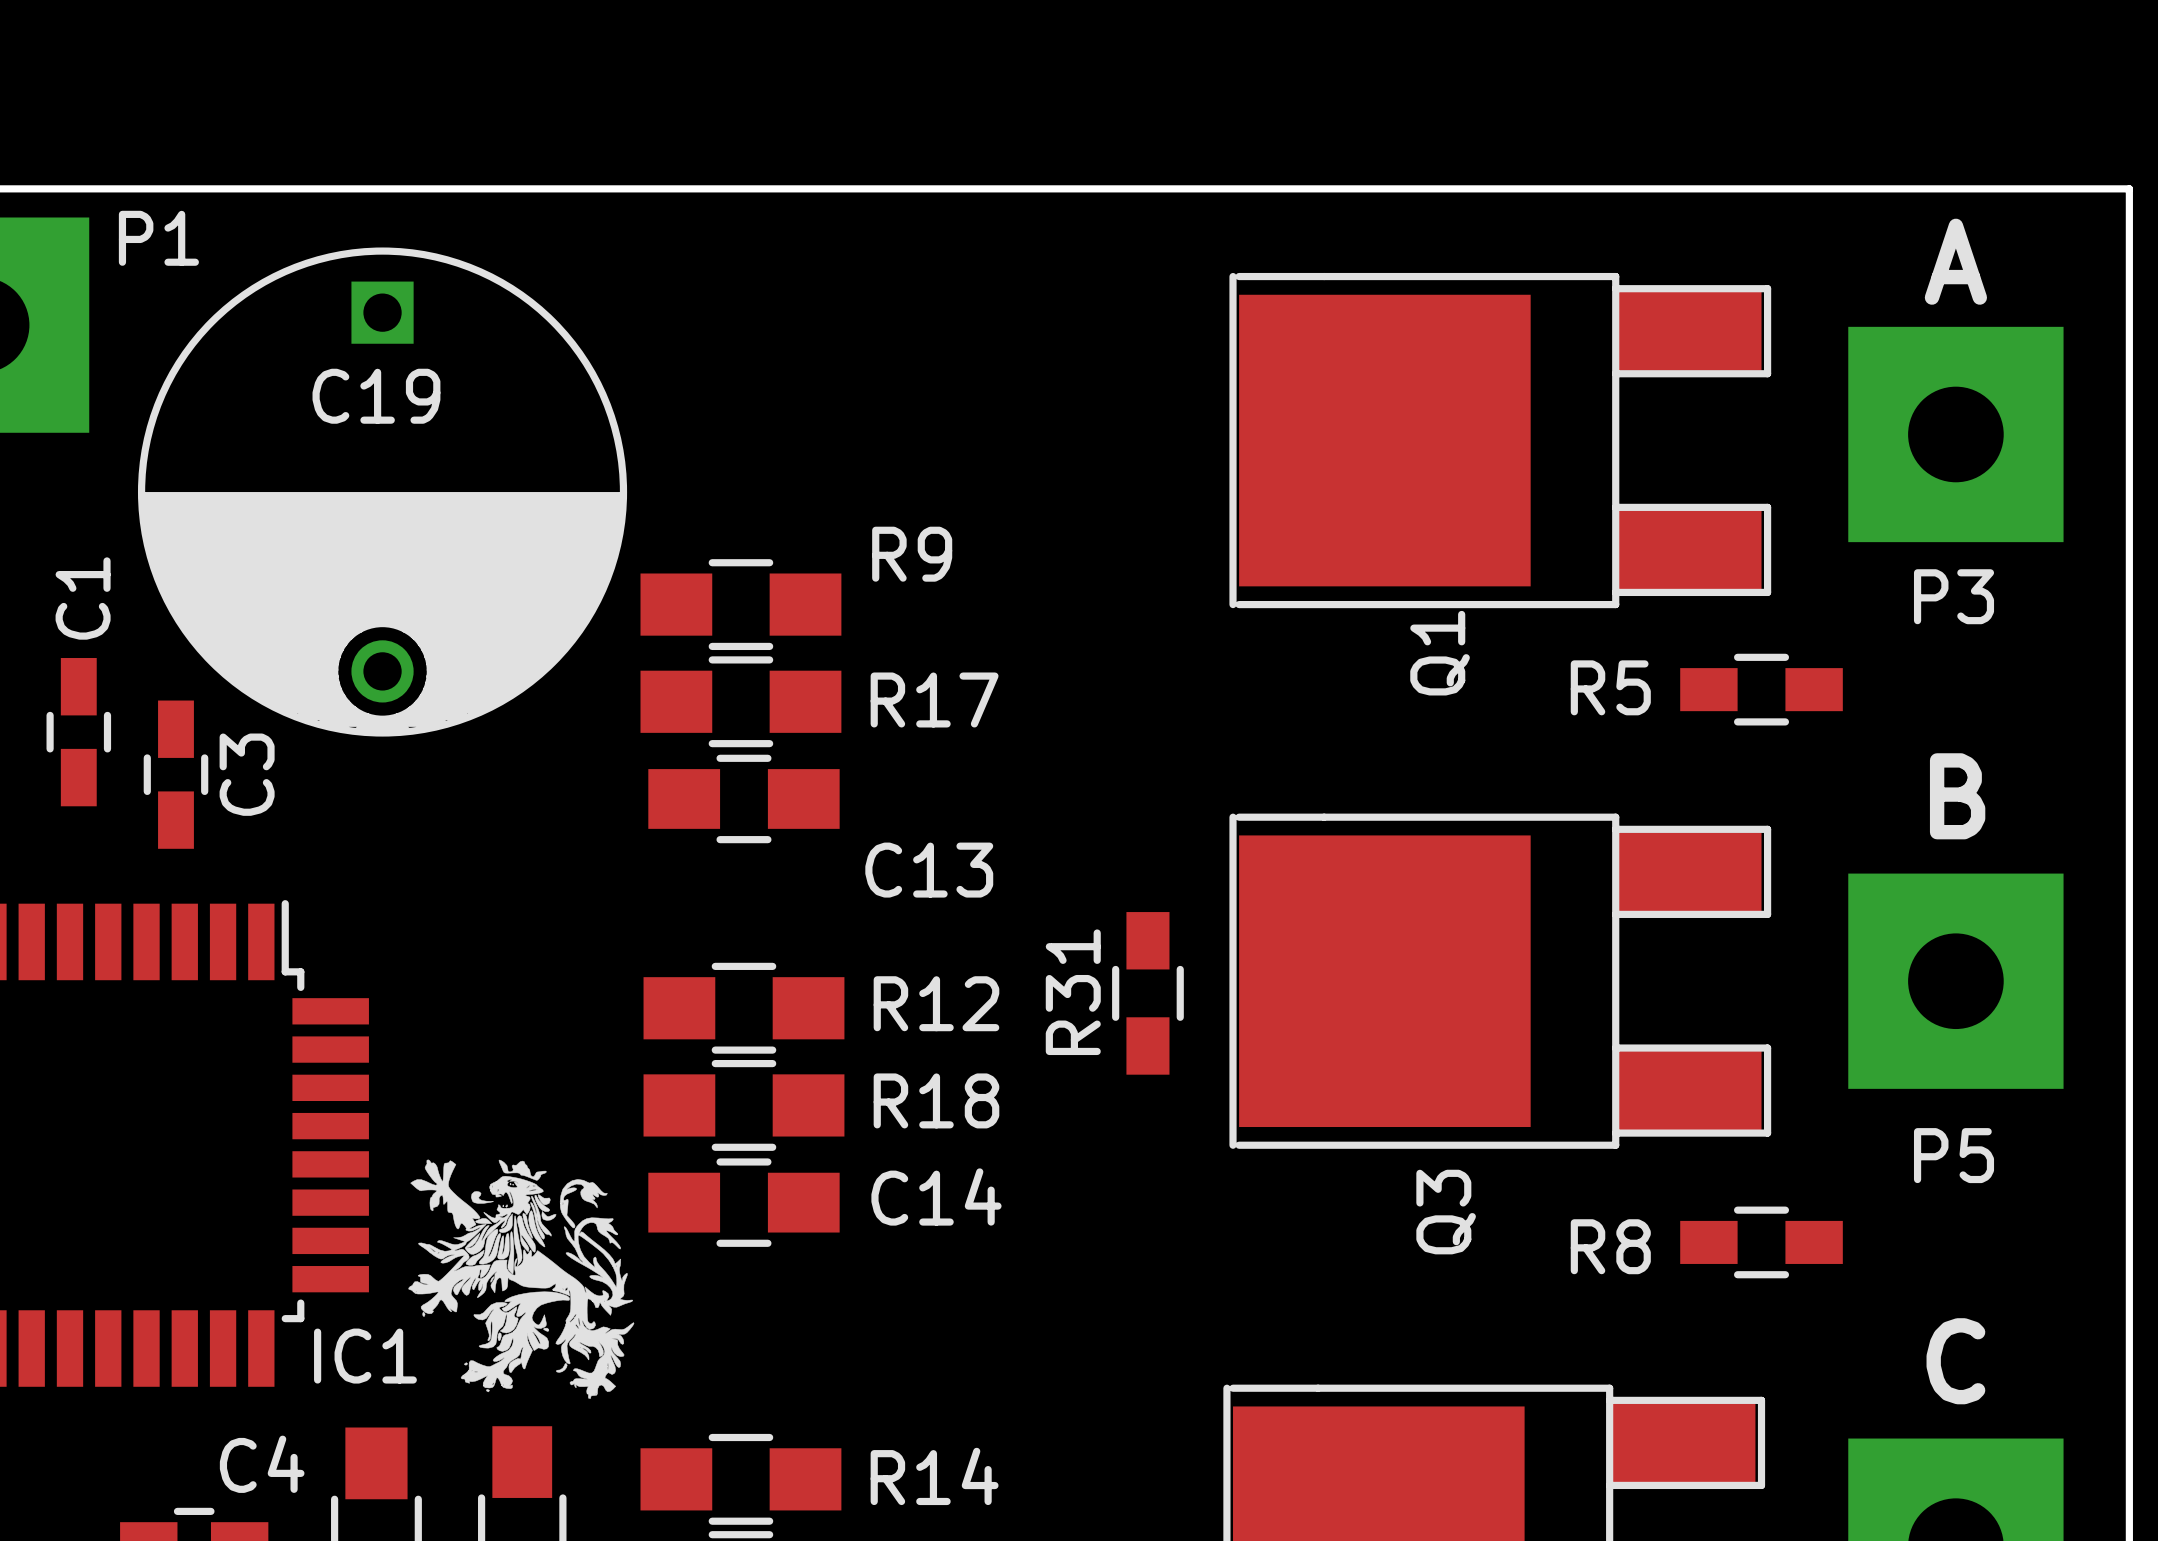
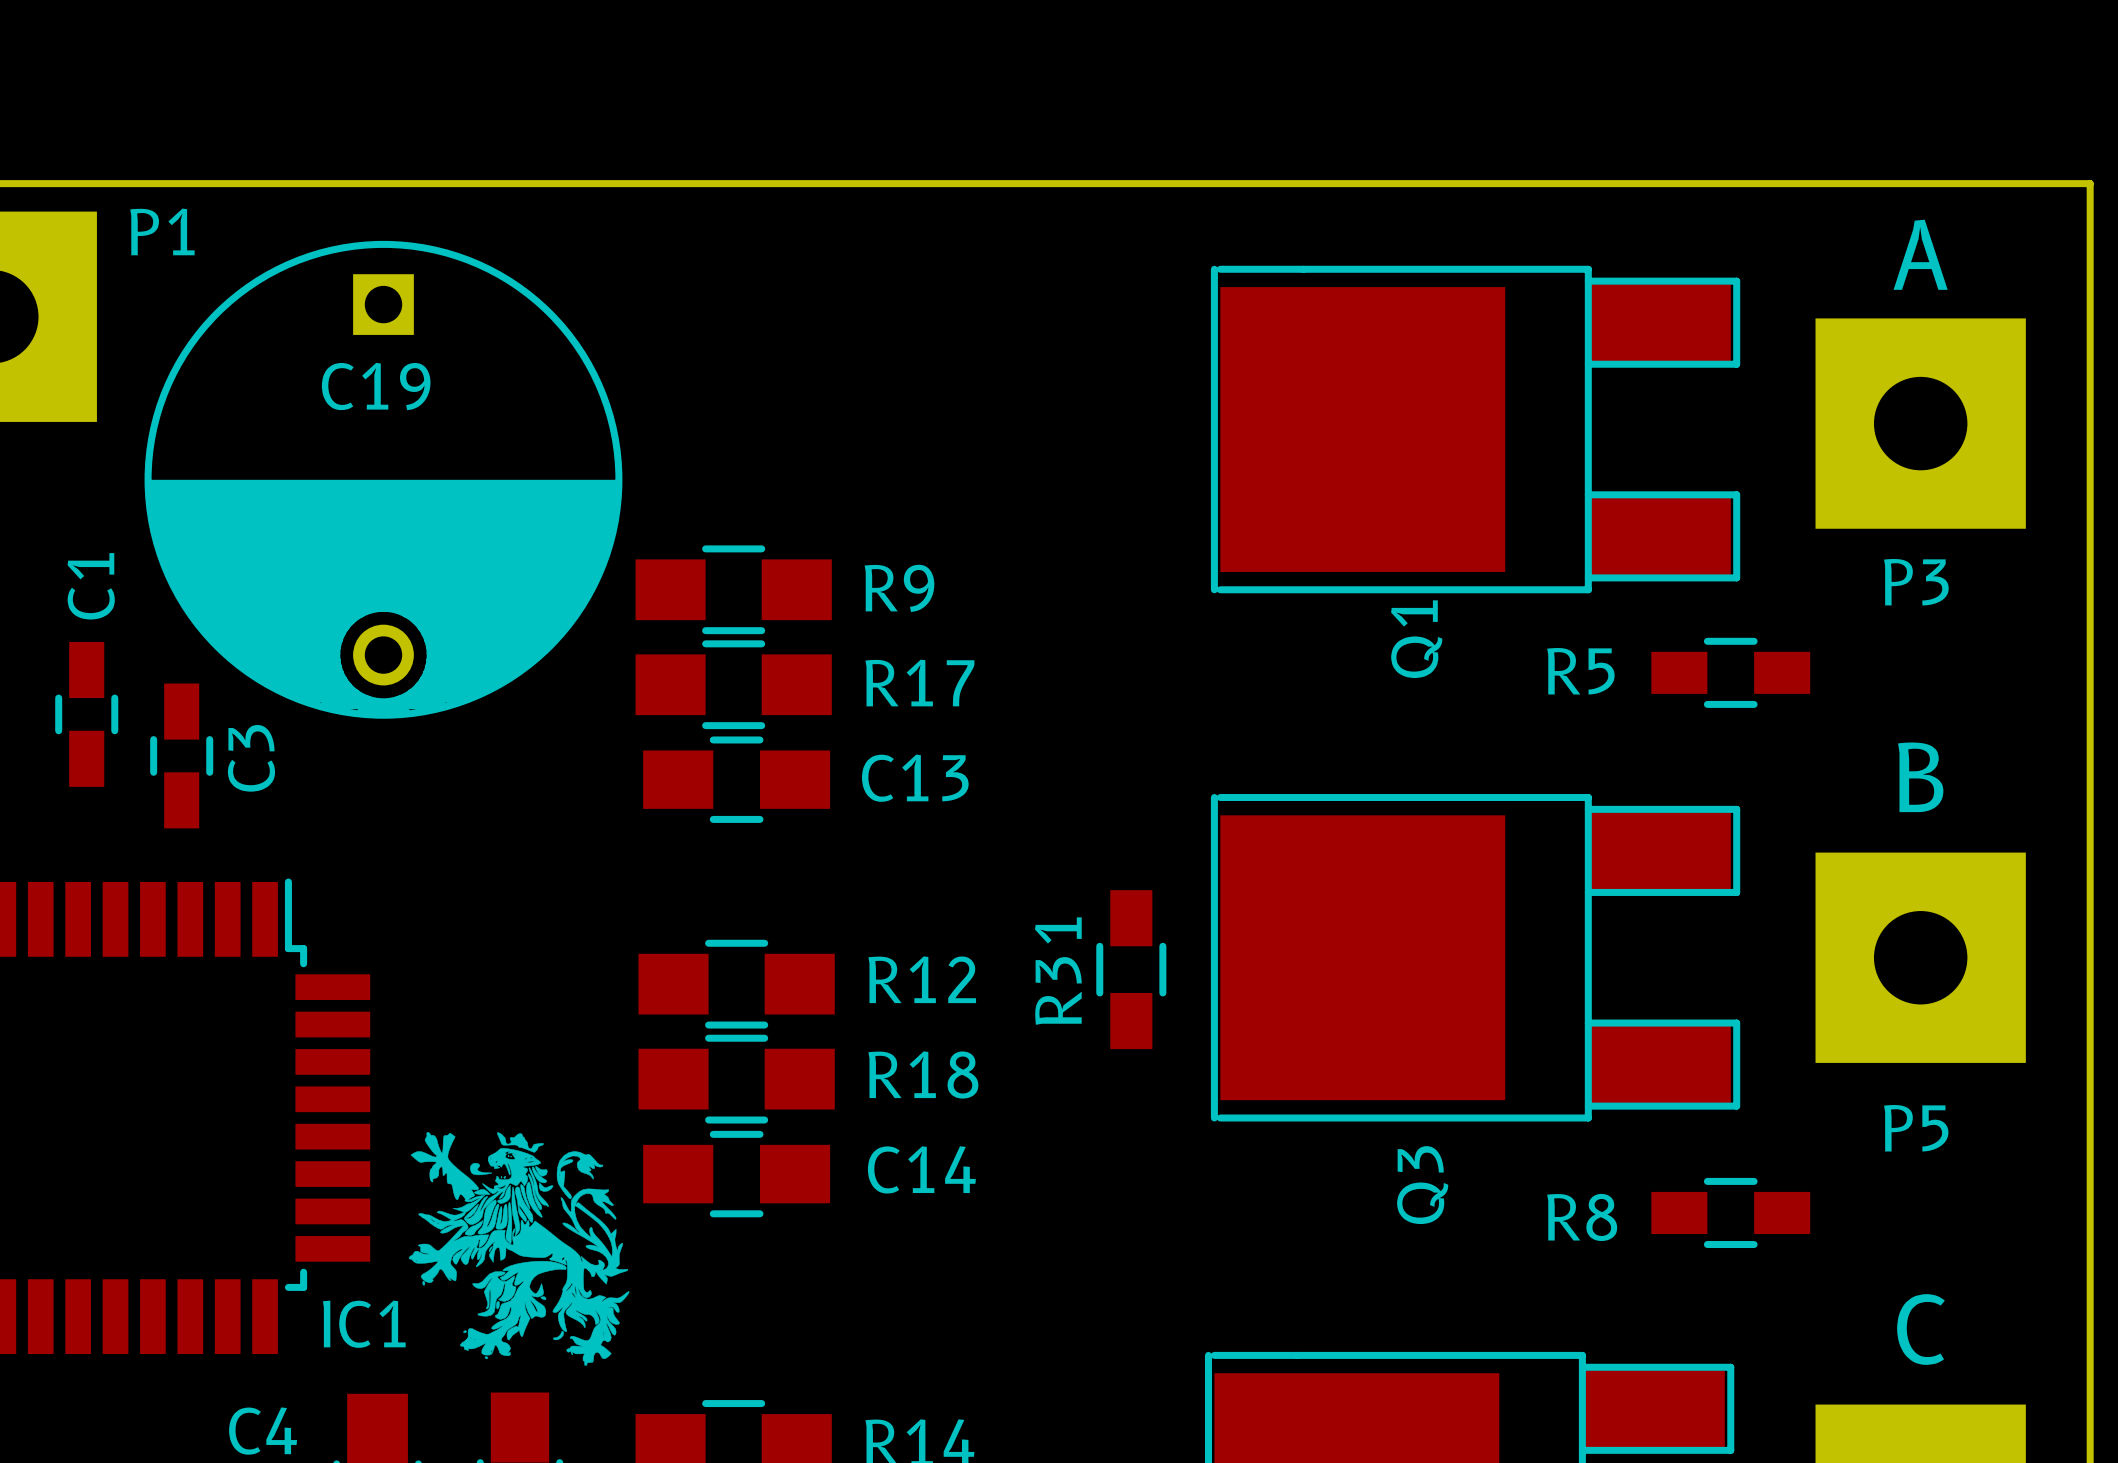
R9 name position: R9 (912, 554) -> R9 (899, 588)
C13 name position: C13 (929, 870) -> C13 (915, 778)

